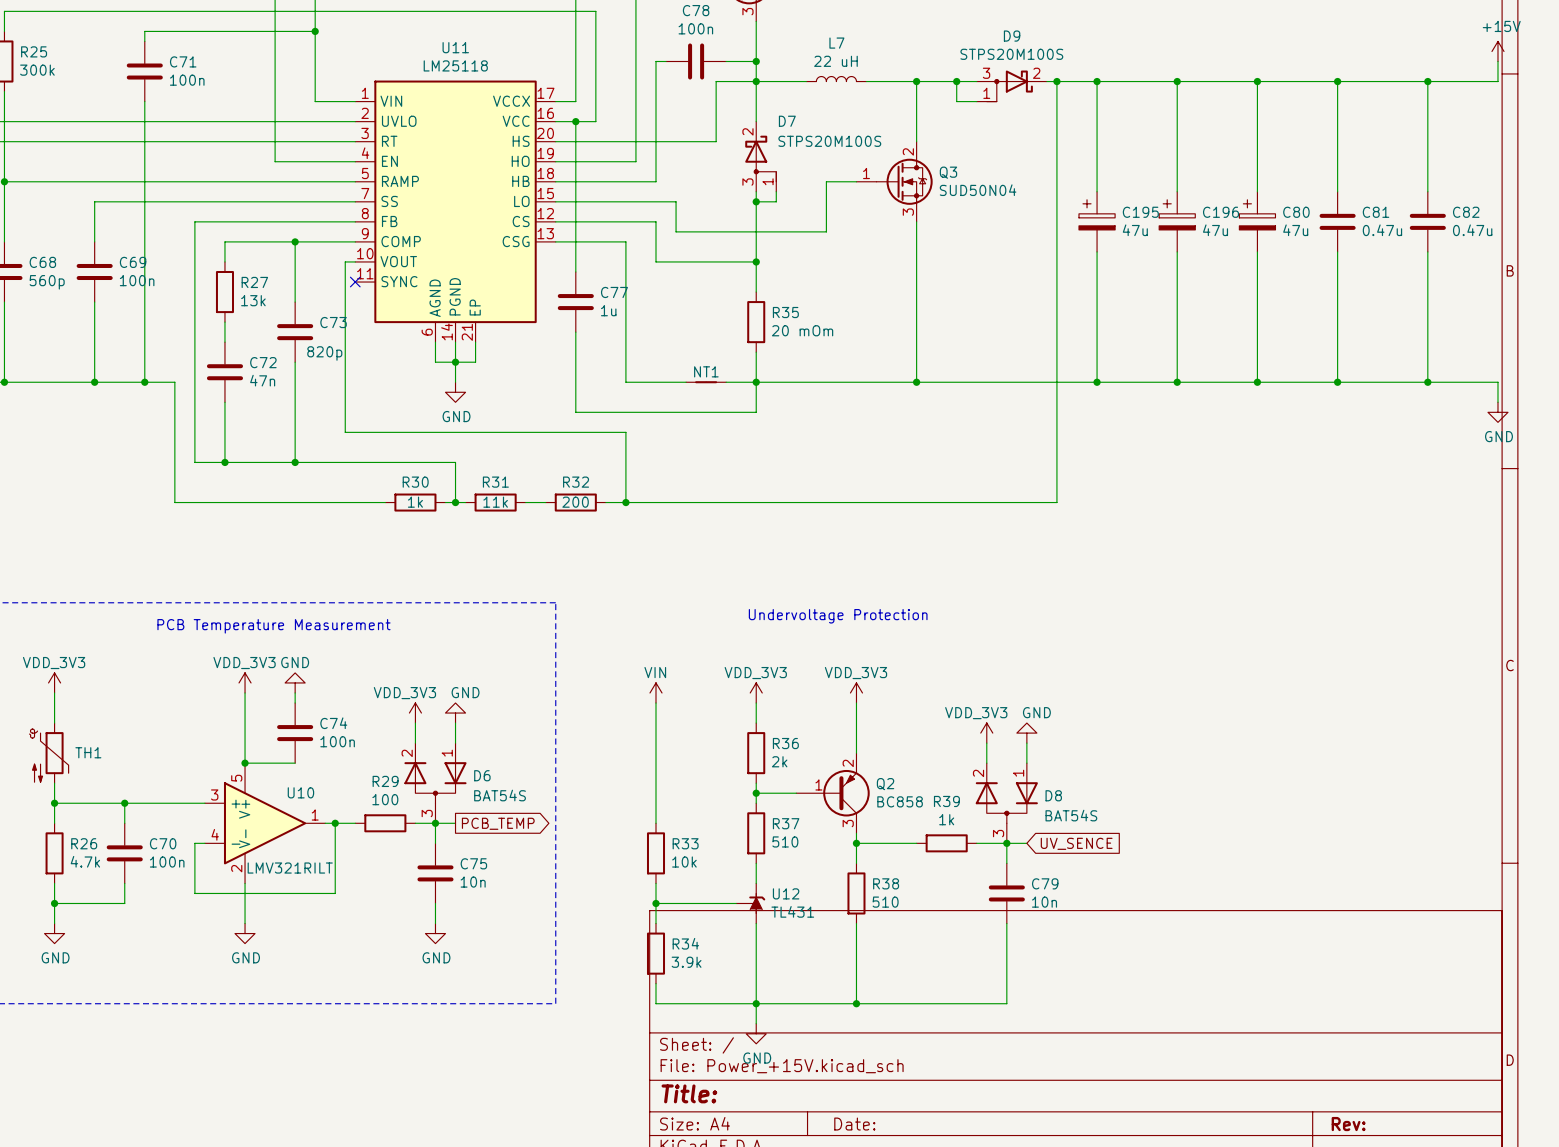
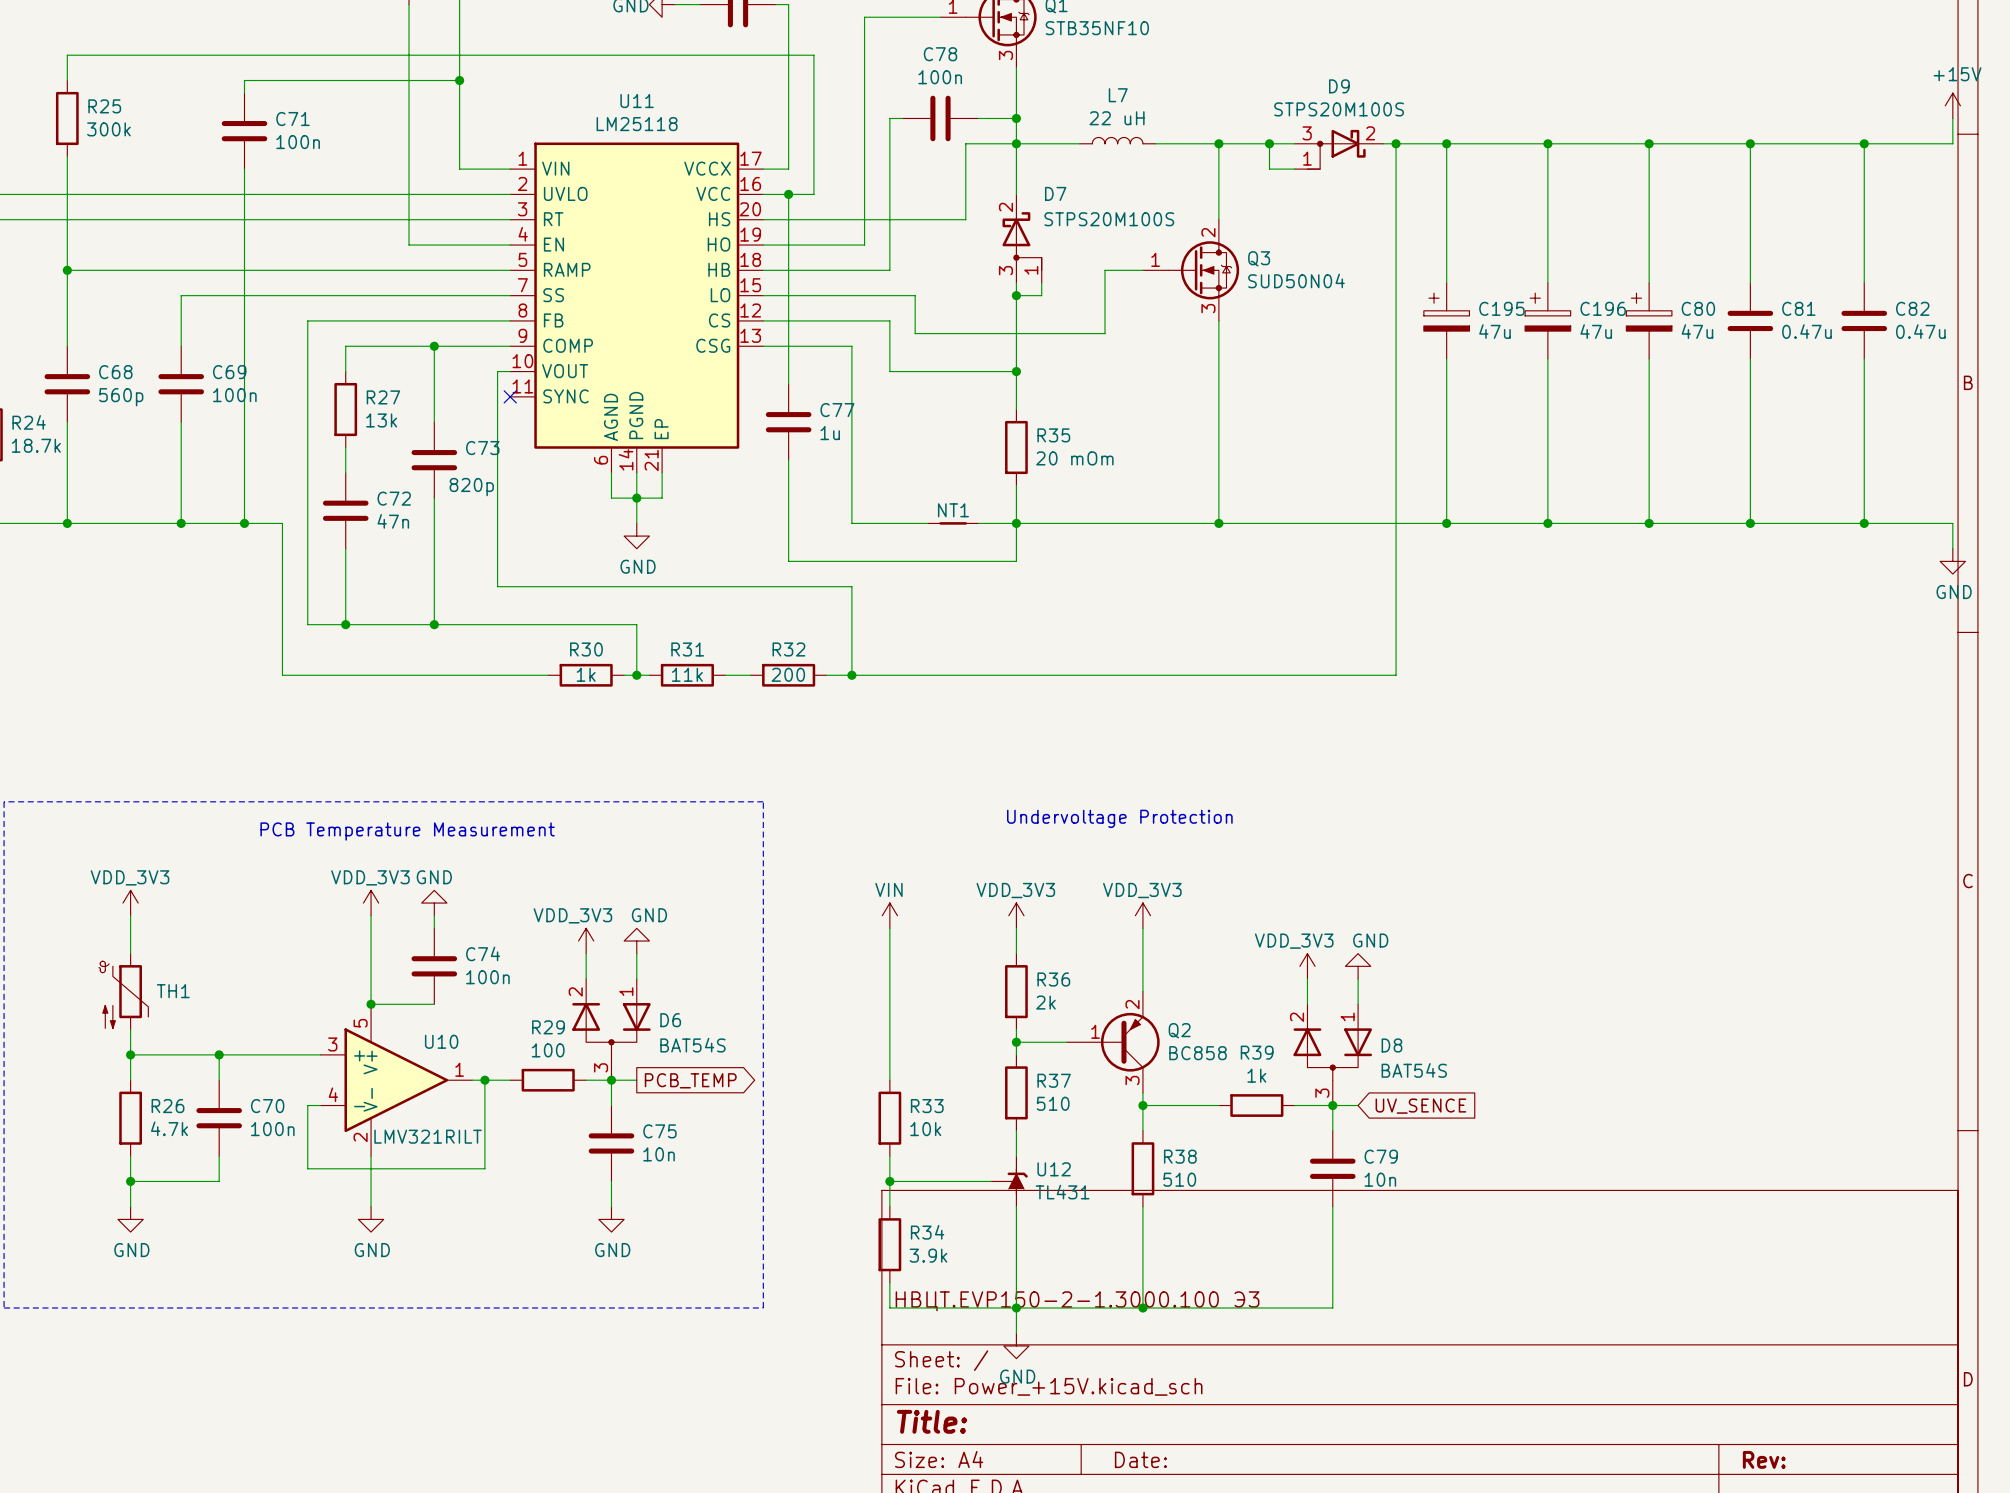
title block: none -> НВЦТ.EVP150-2-1.3000.100 Э3 (1077, 1301)

